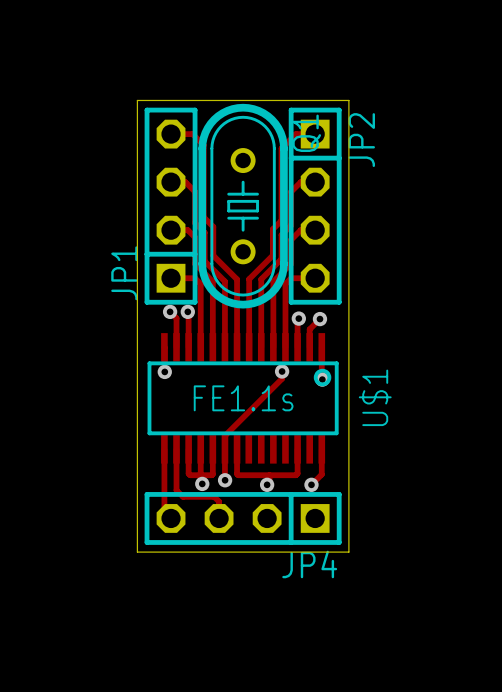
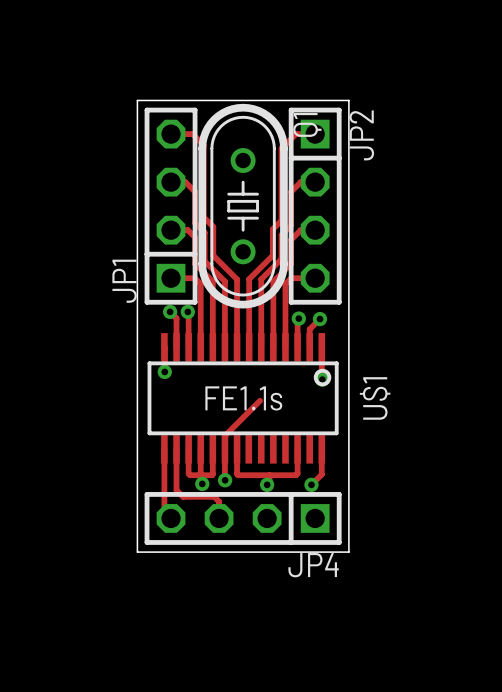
track: (282, 371) (282, 378) (260, 400) -> none
via: (282, 371) -> none

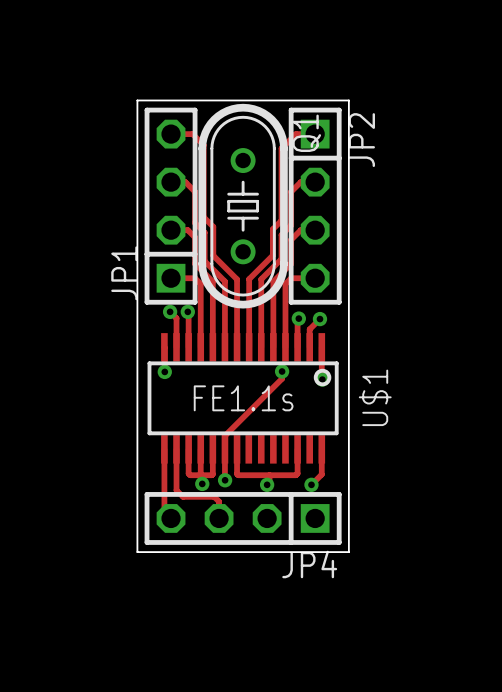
track: none -> (282, 371) (282, 378) (260, 400)
via: none -> (282, 371)

